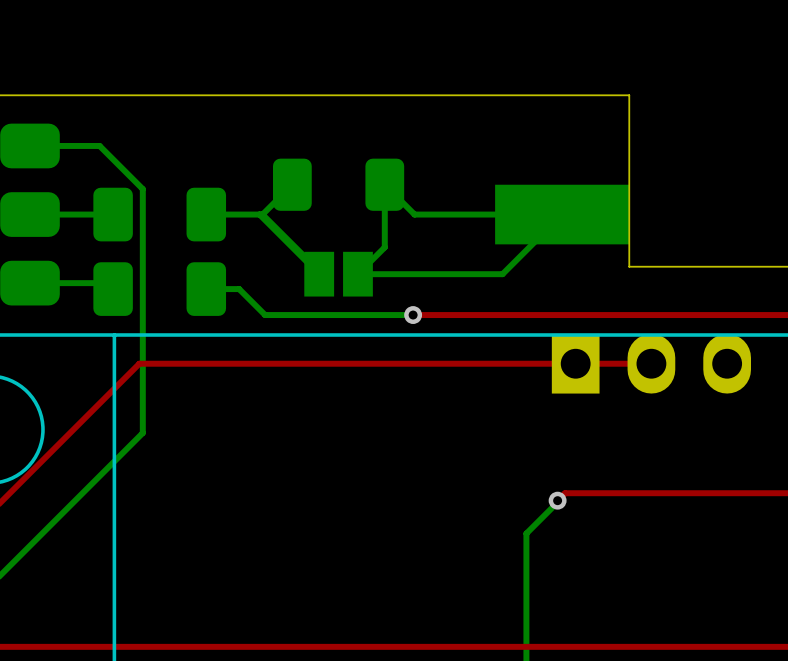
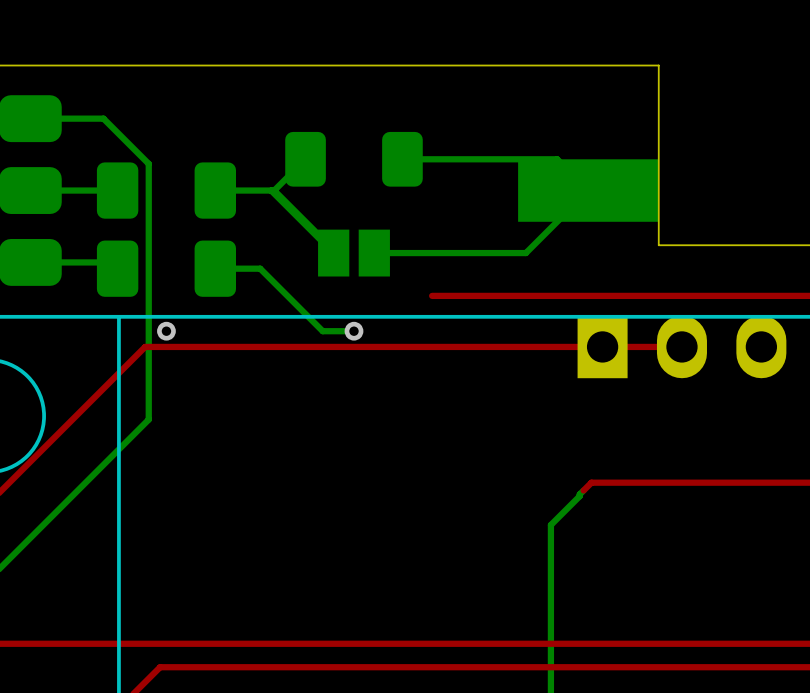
bottom track: (562, 214) (414, 214) (384, 184) (384, 247) (357, 274) -> (588, 190) (557, 159) (402, 159)
bottom track: (239, 289) (265, 315) (413, 315) -> (249, 268) (260, 268) (322, 331) (354, 331)
via position: (413, 315) -> (354, 331)
via: none -> (166, 331)
via: (557, 500) -> none

